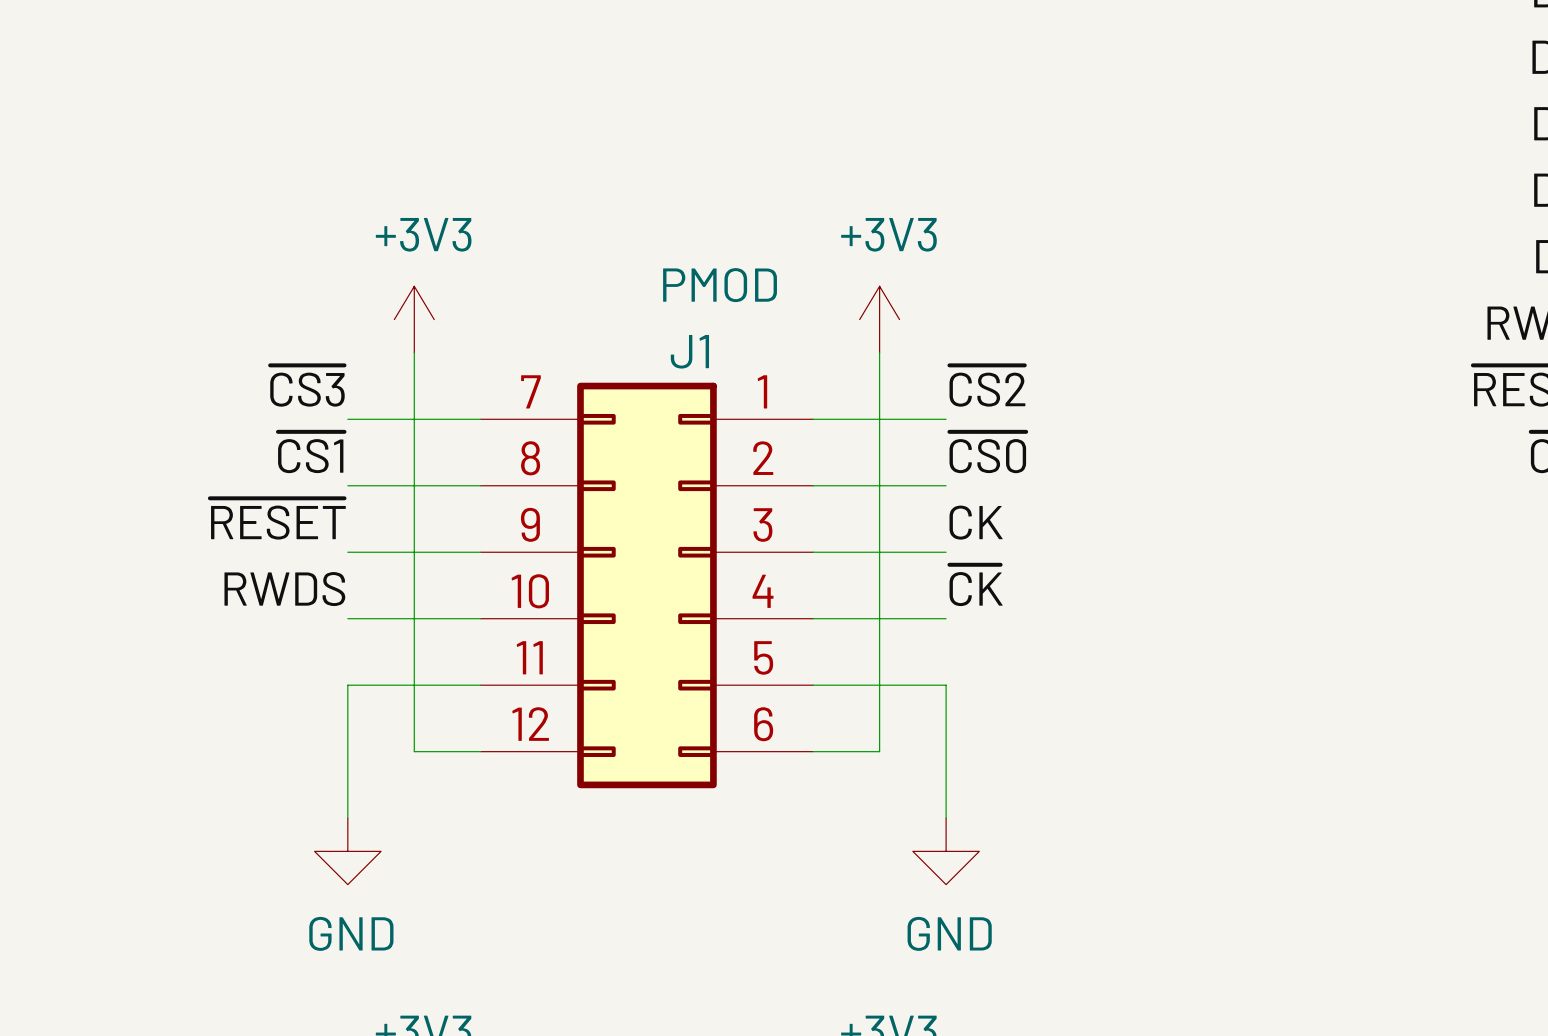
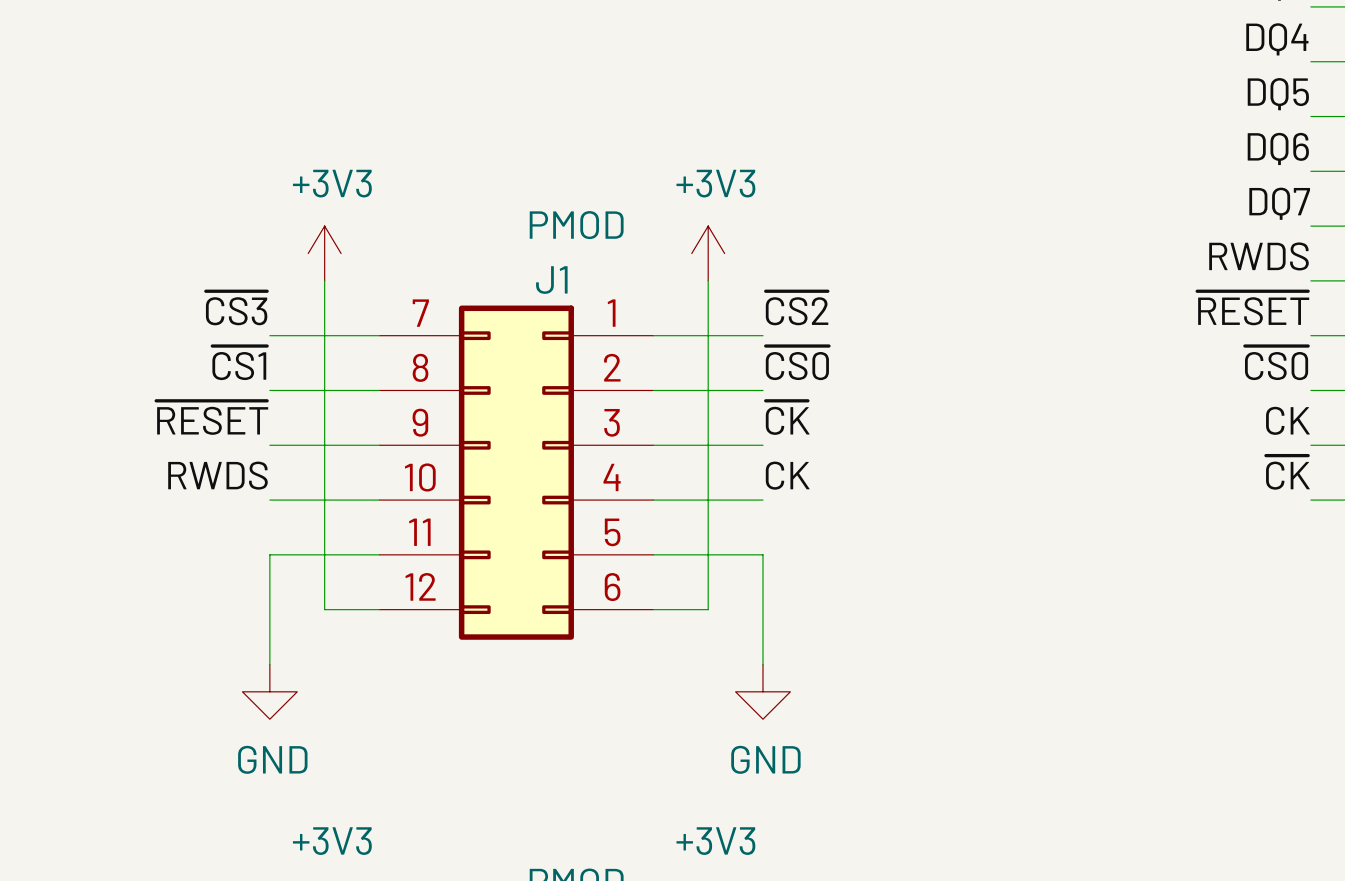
label: CK (976, 522) -> ~{CK} (787, 417)
label: ~{CK} (976, 585) -> CK (787, 475)

